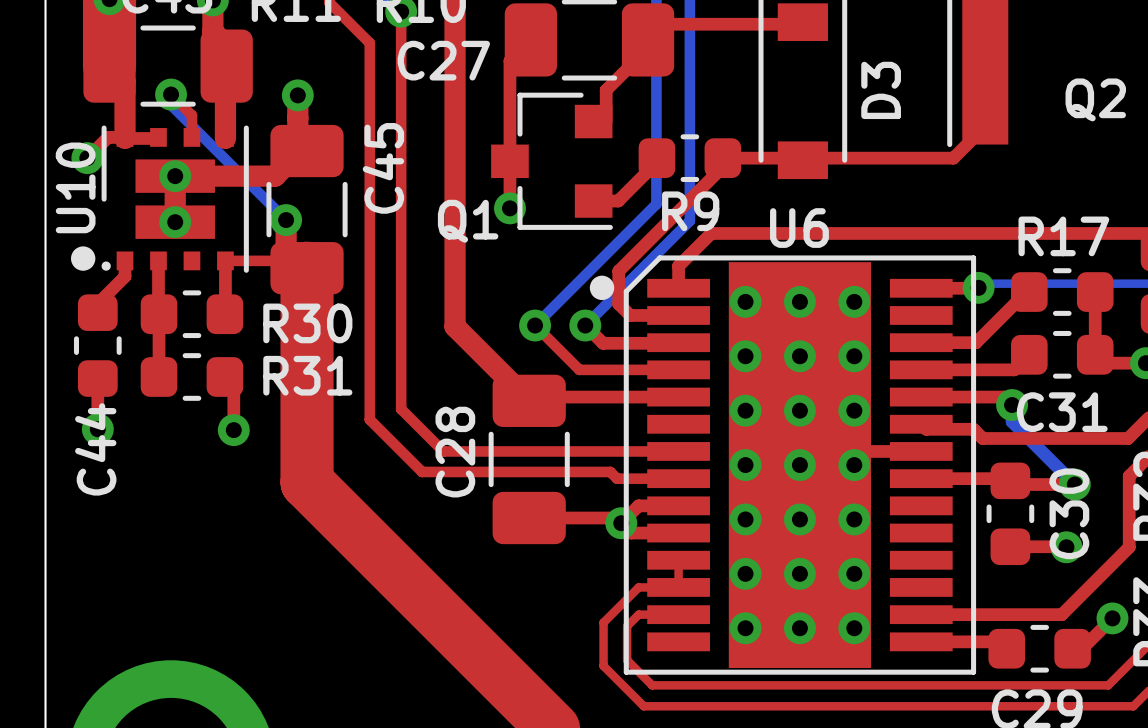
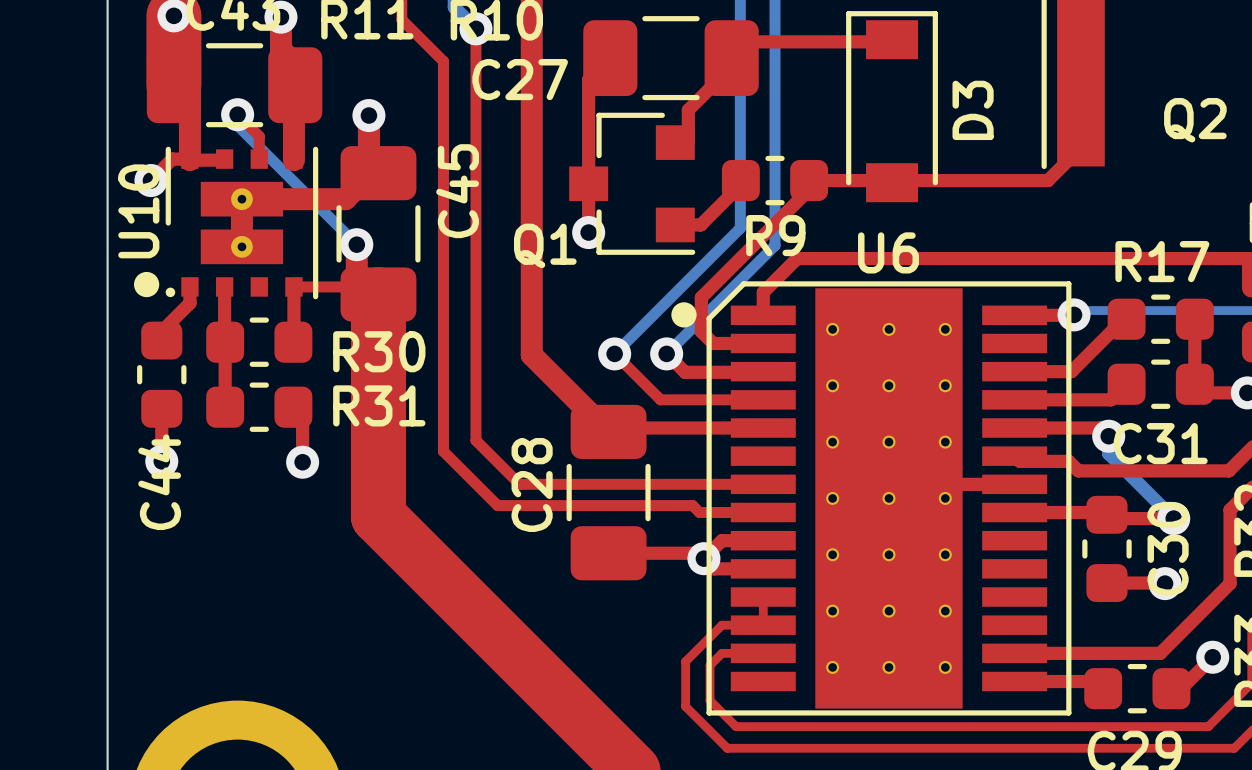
U10 footprint: [101, 125, 249, 273] -> [165, 146, 319, 300]
U6 footprint: [623, 255, 977, 675] -> [706, 281, 1072, 716]

